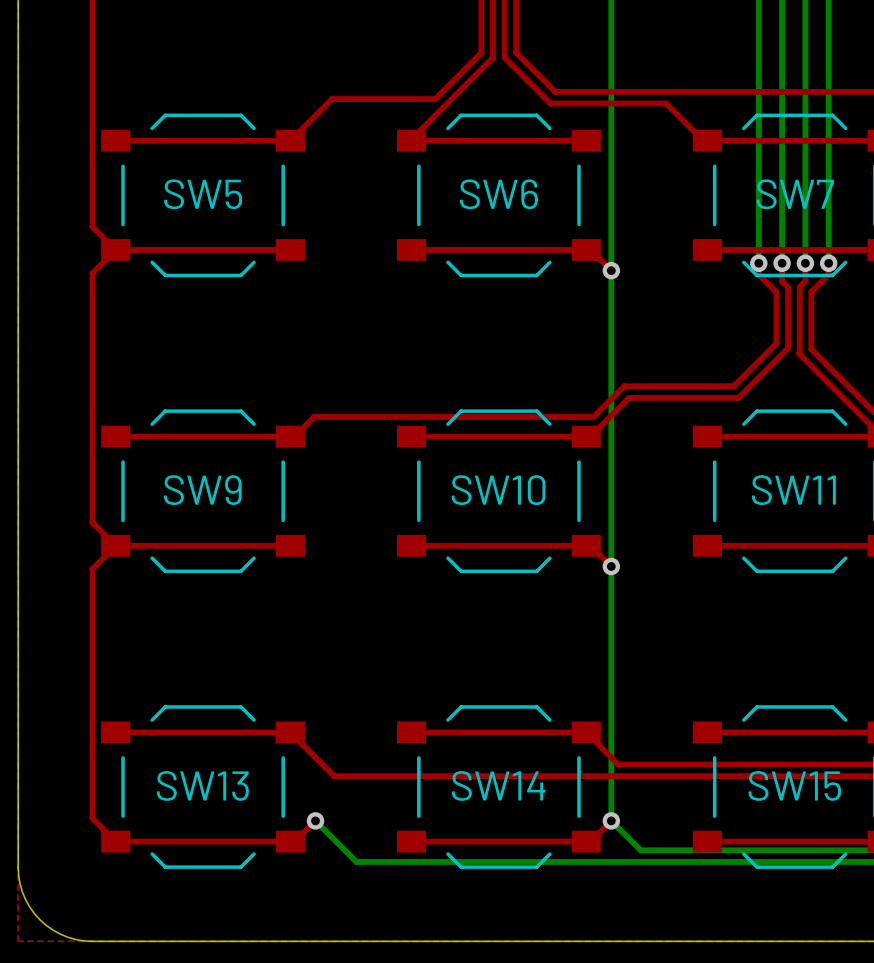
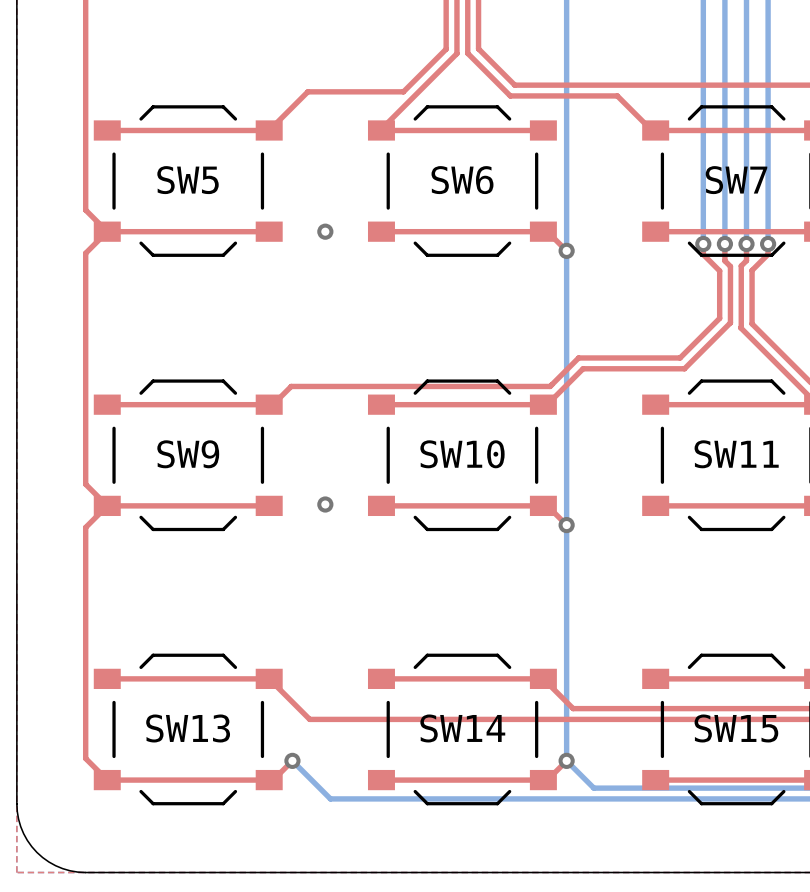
via: none -> (325, 231)
via: none -> (325, 504)

